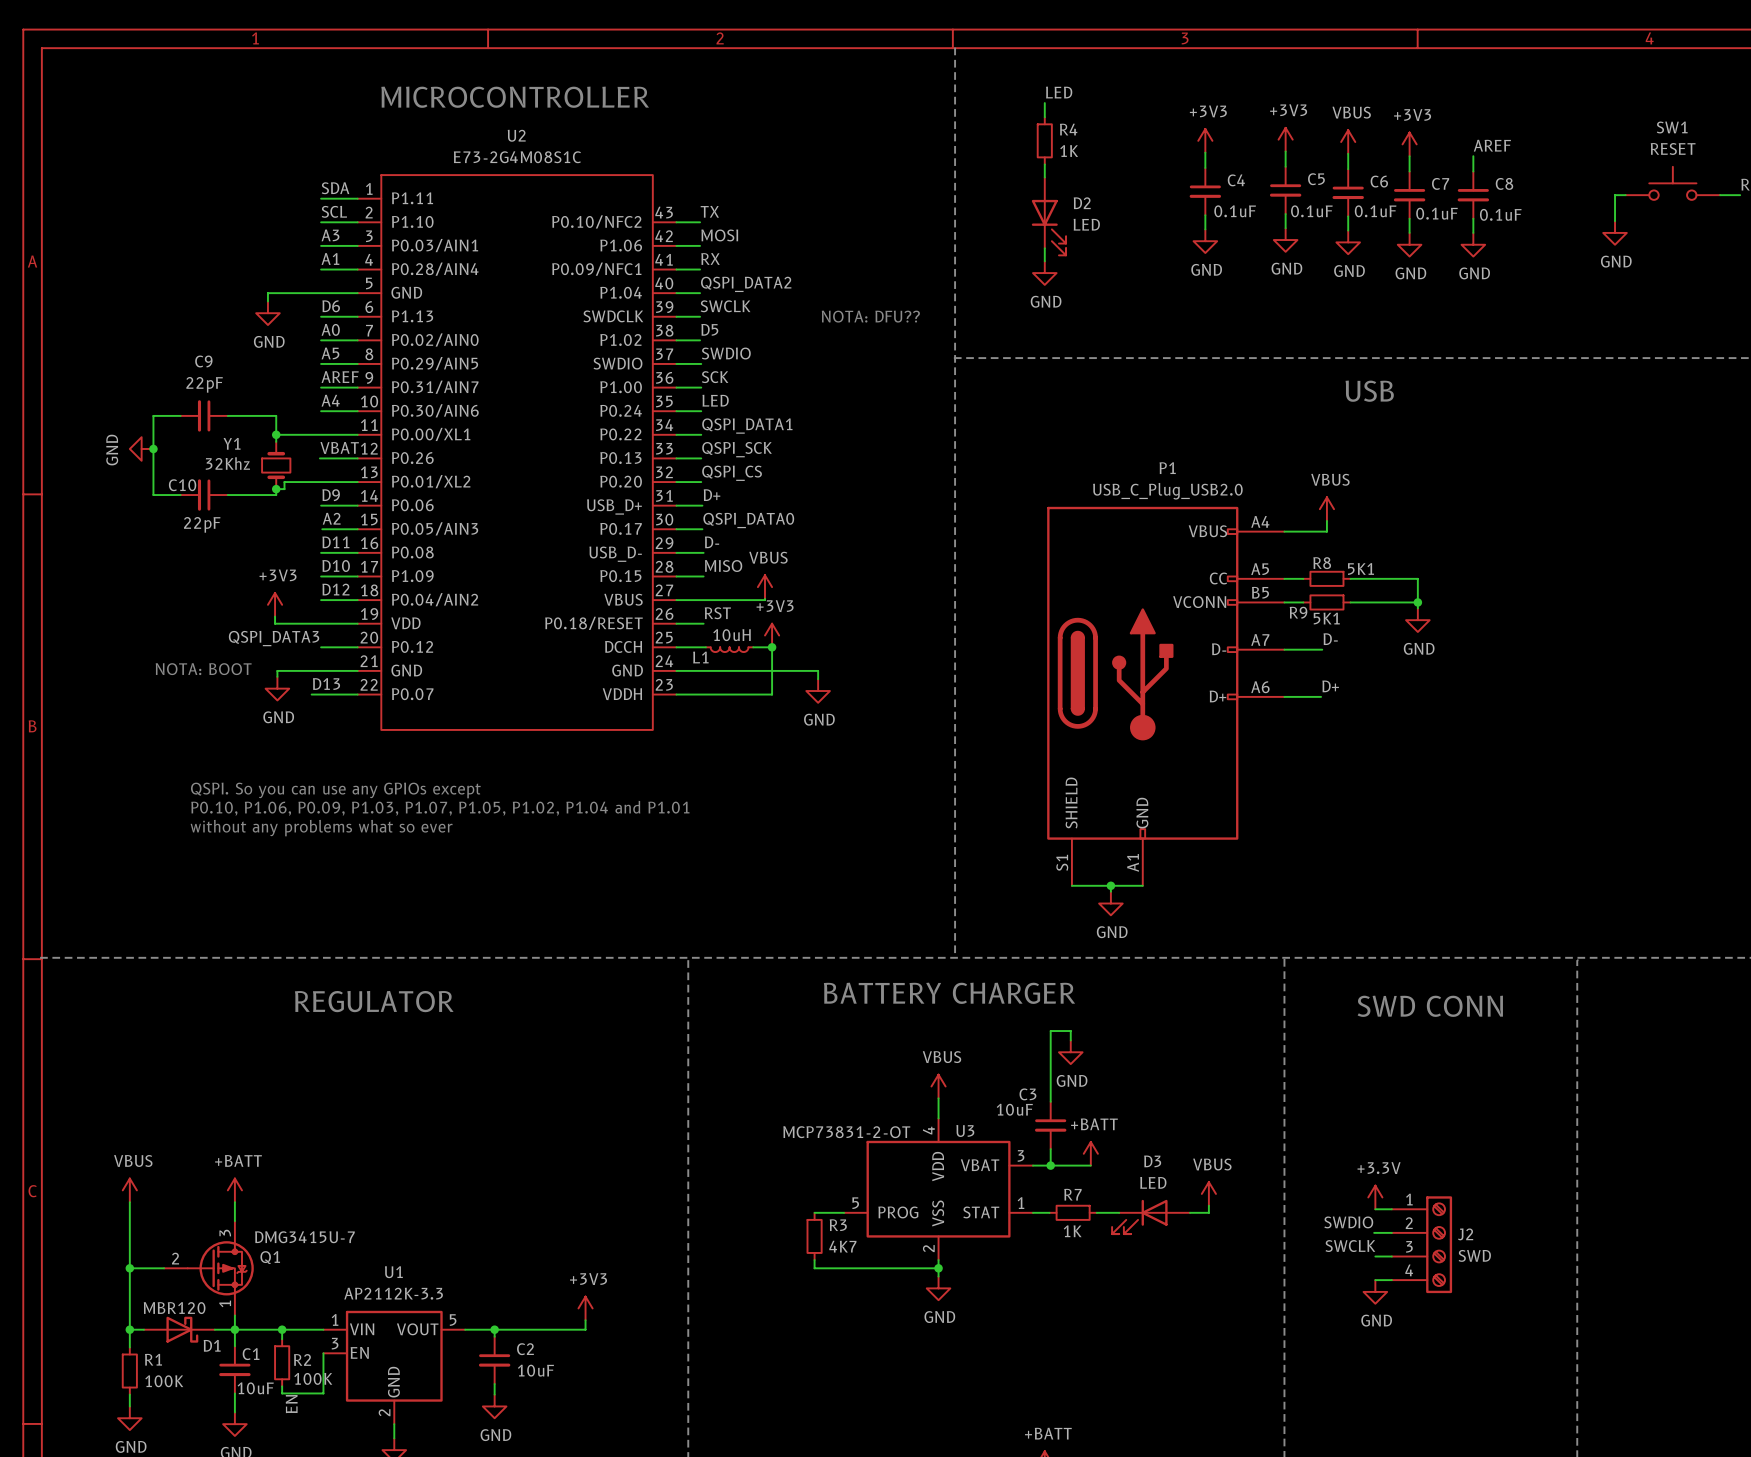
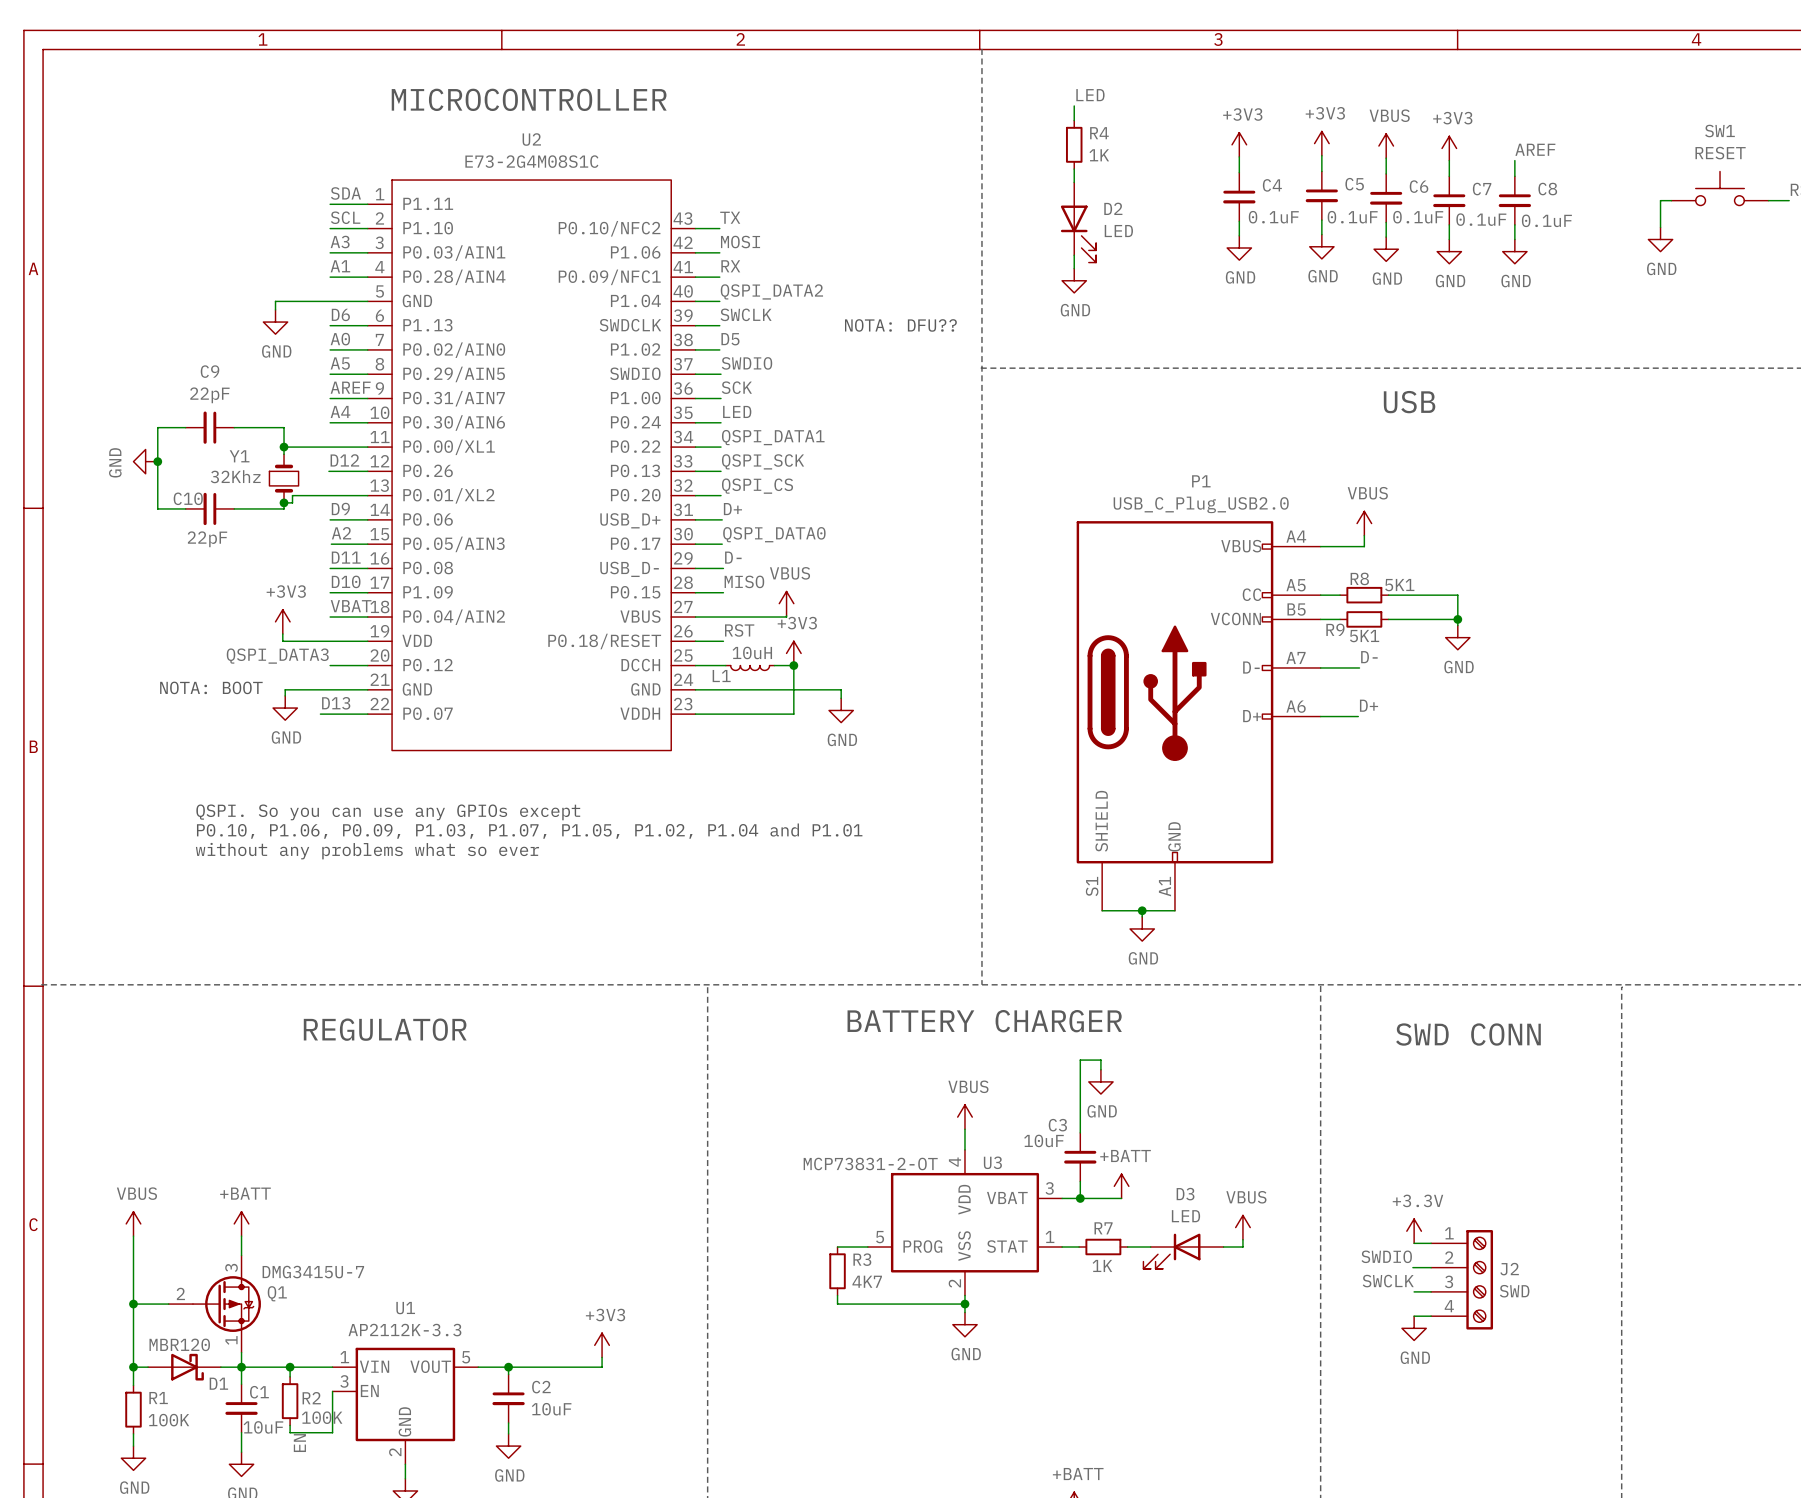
label: VBAT (339, 447) -> D12 (344, 460)
label: D12 (335, 589) -> VBAT (351, 606)

